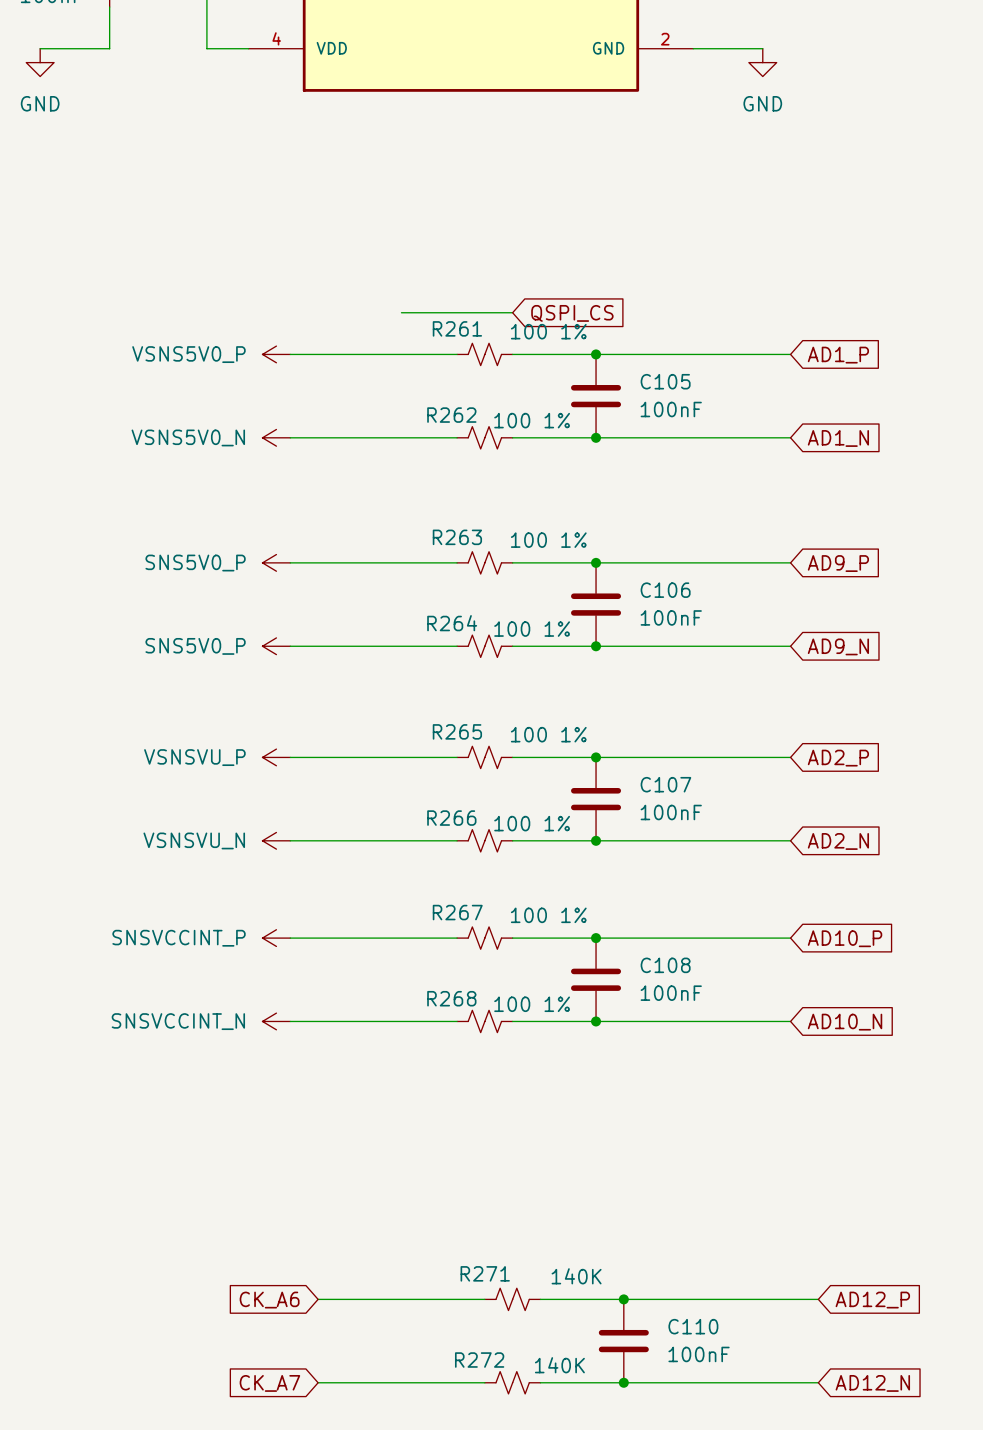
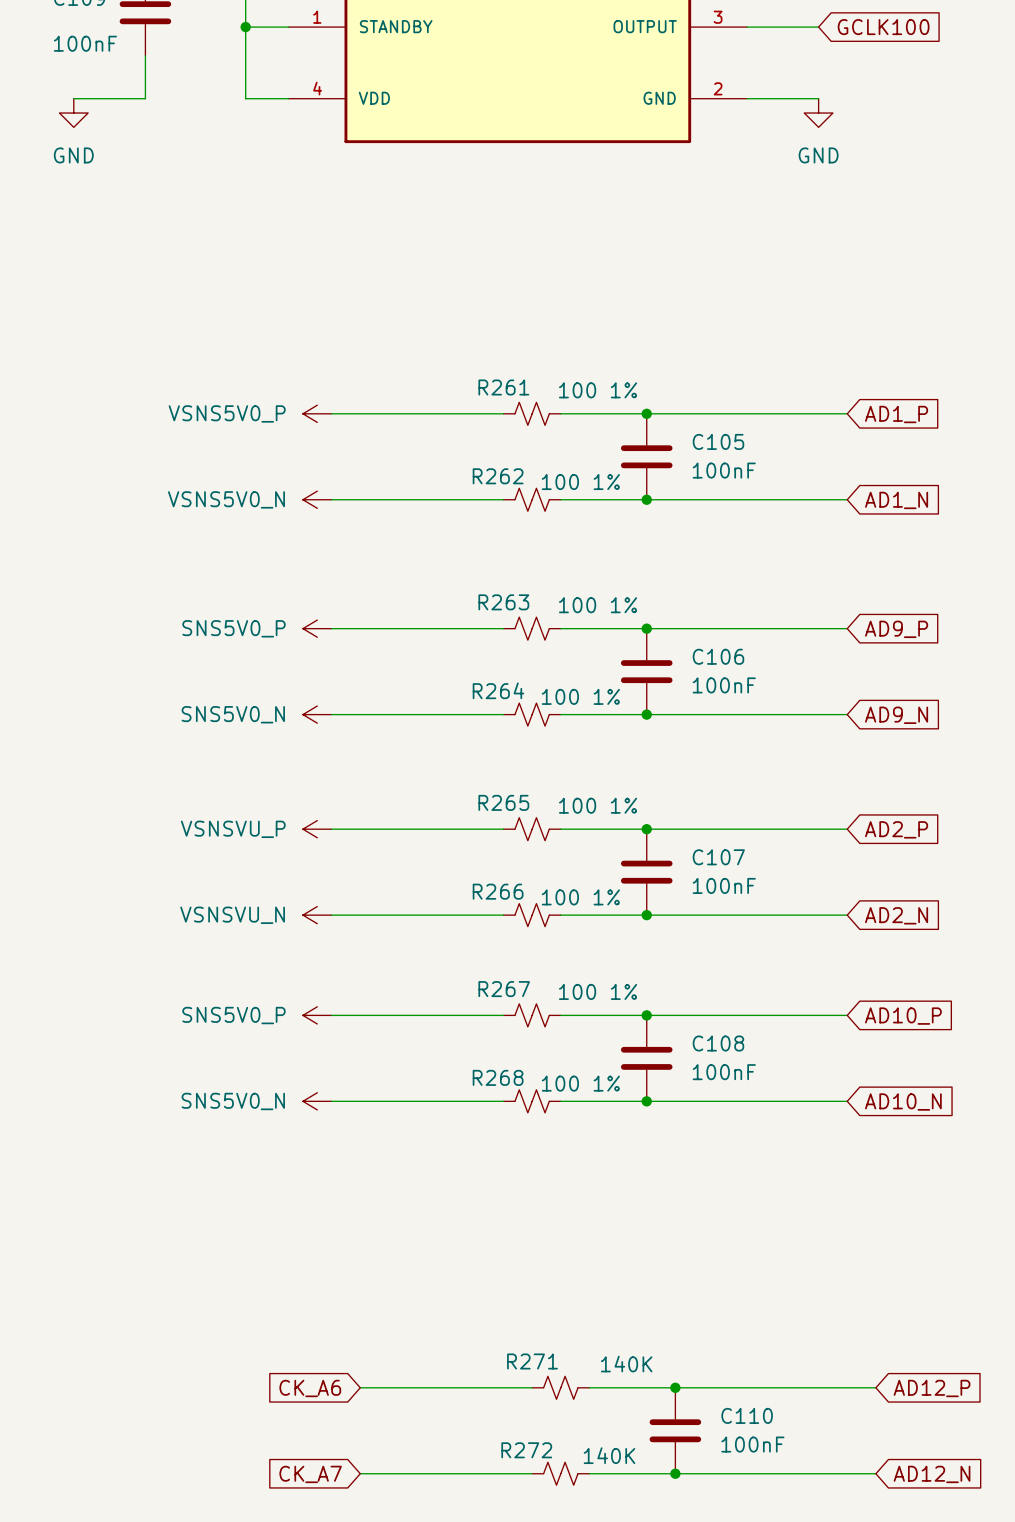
wire: (401, 312) (512, 312) -> none
global label: QSPI_CS (572, 313) -> none
power symbol: SNS5V0_P (276, 646) -> SNS5V0_N (317, 714)
power symbol: SNSVCCINT_P (276, 938) -> SNS5V0_P (317, 1015)
power symbol: SNSVCCINT_N (276, 1021) -> SNS5V0_N (317, 1101)

